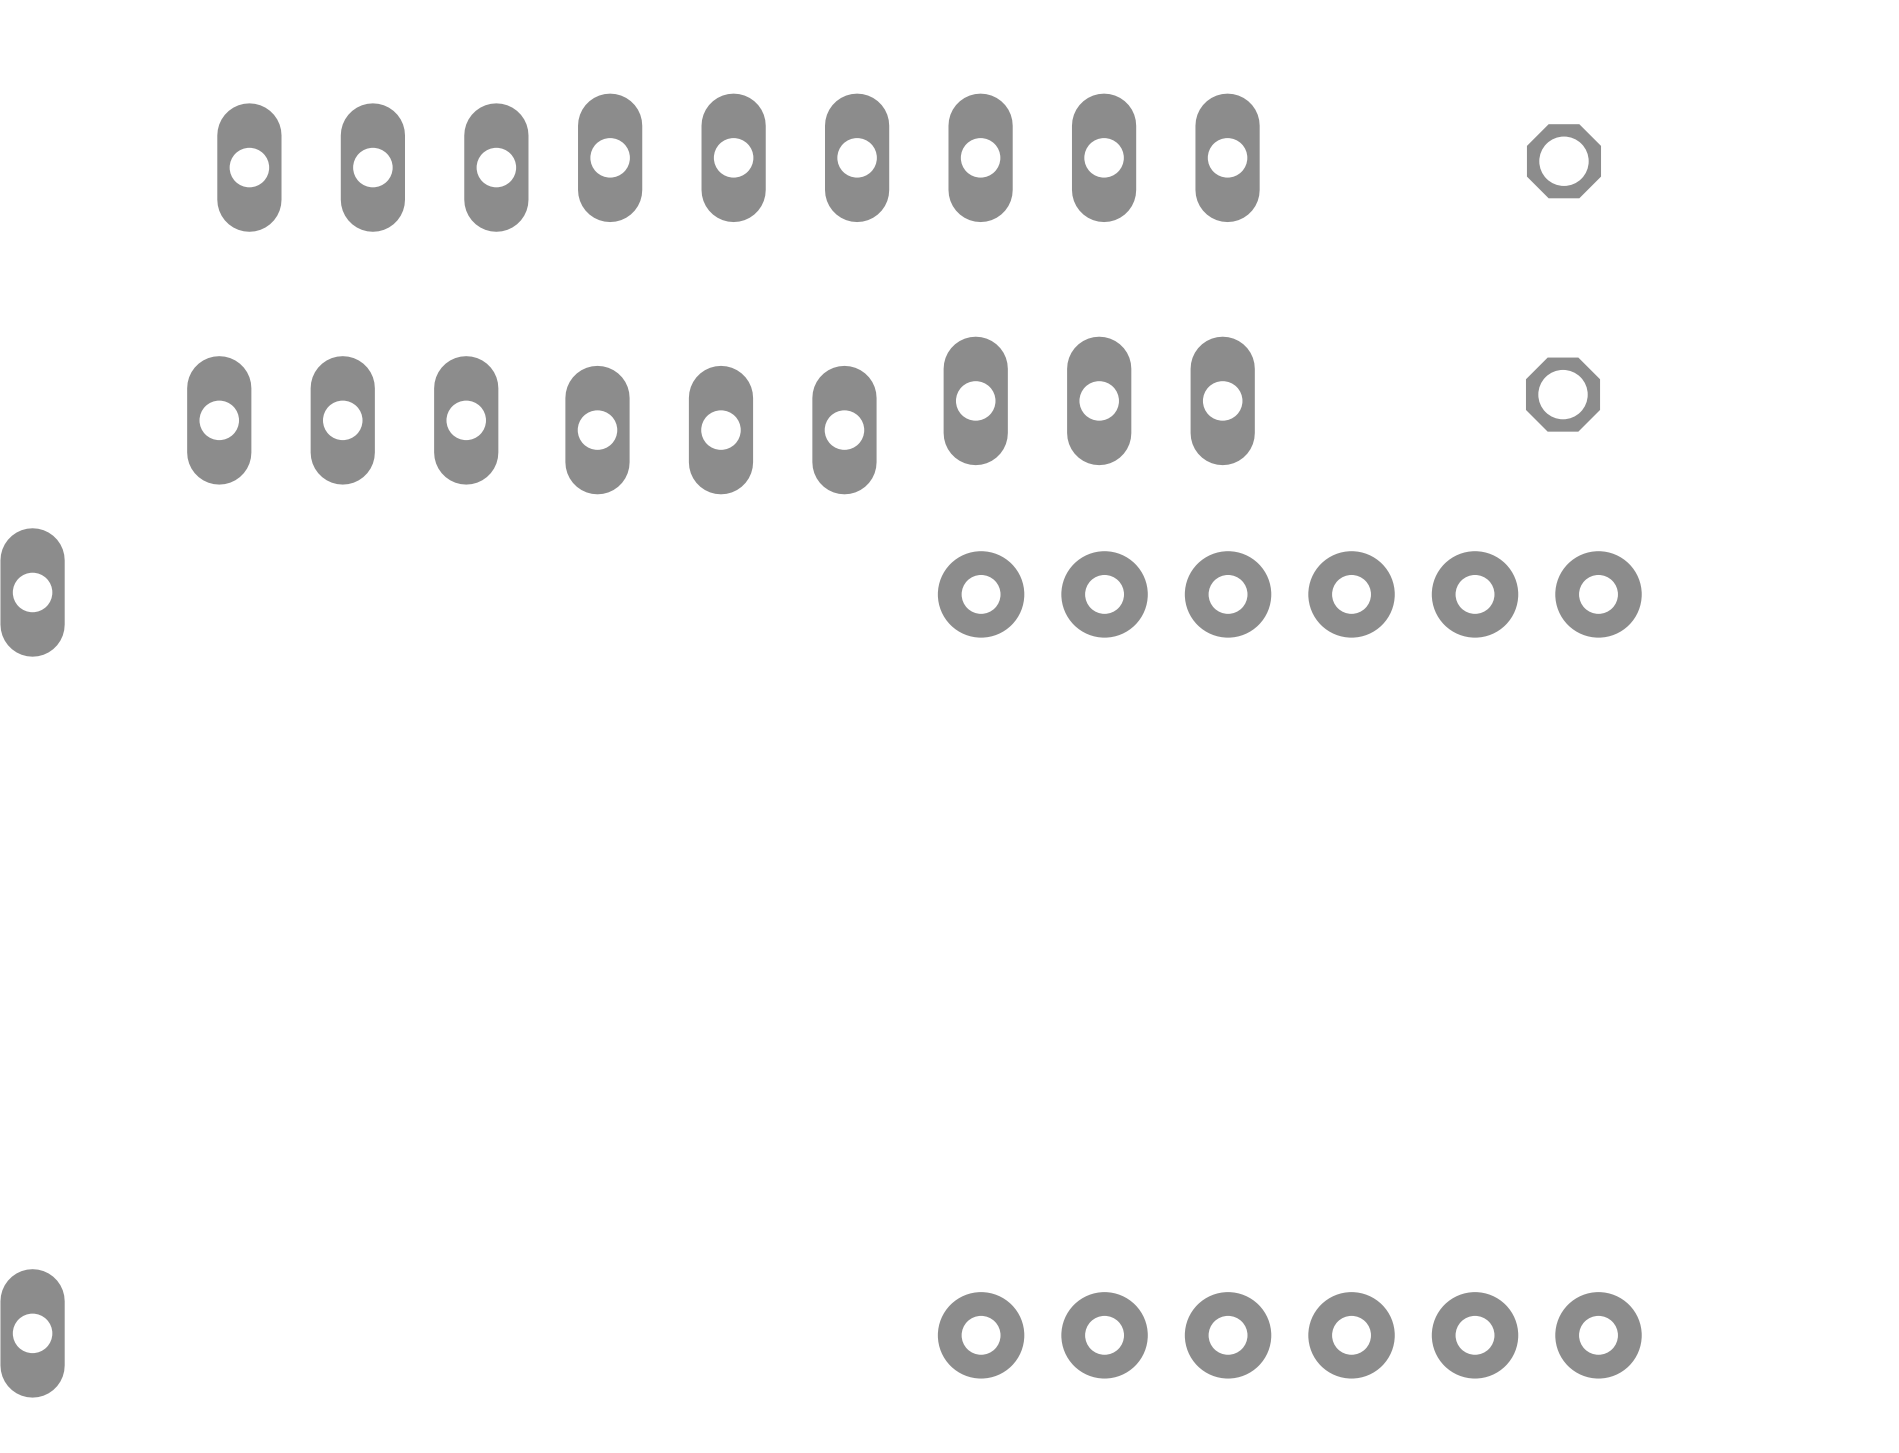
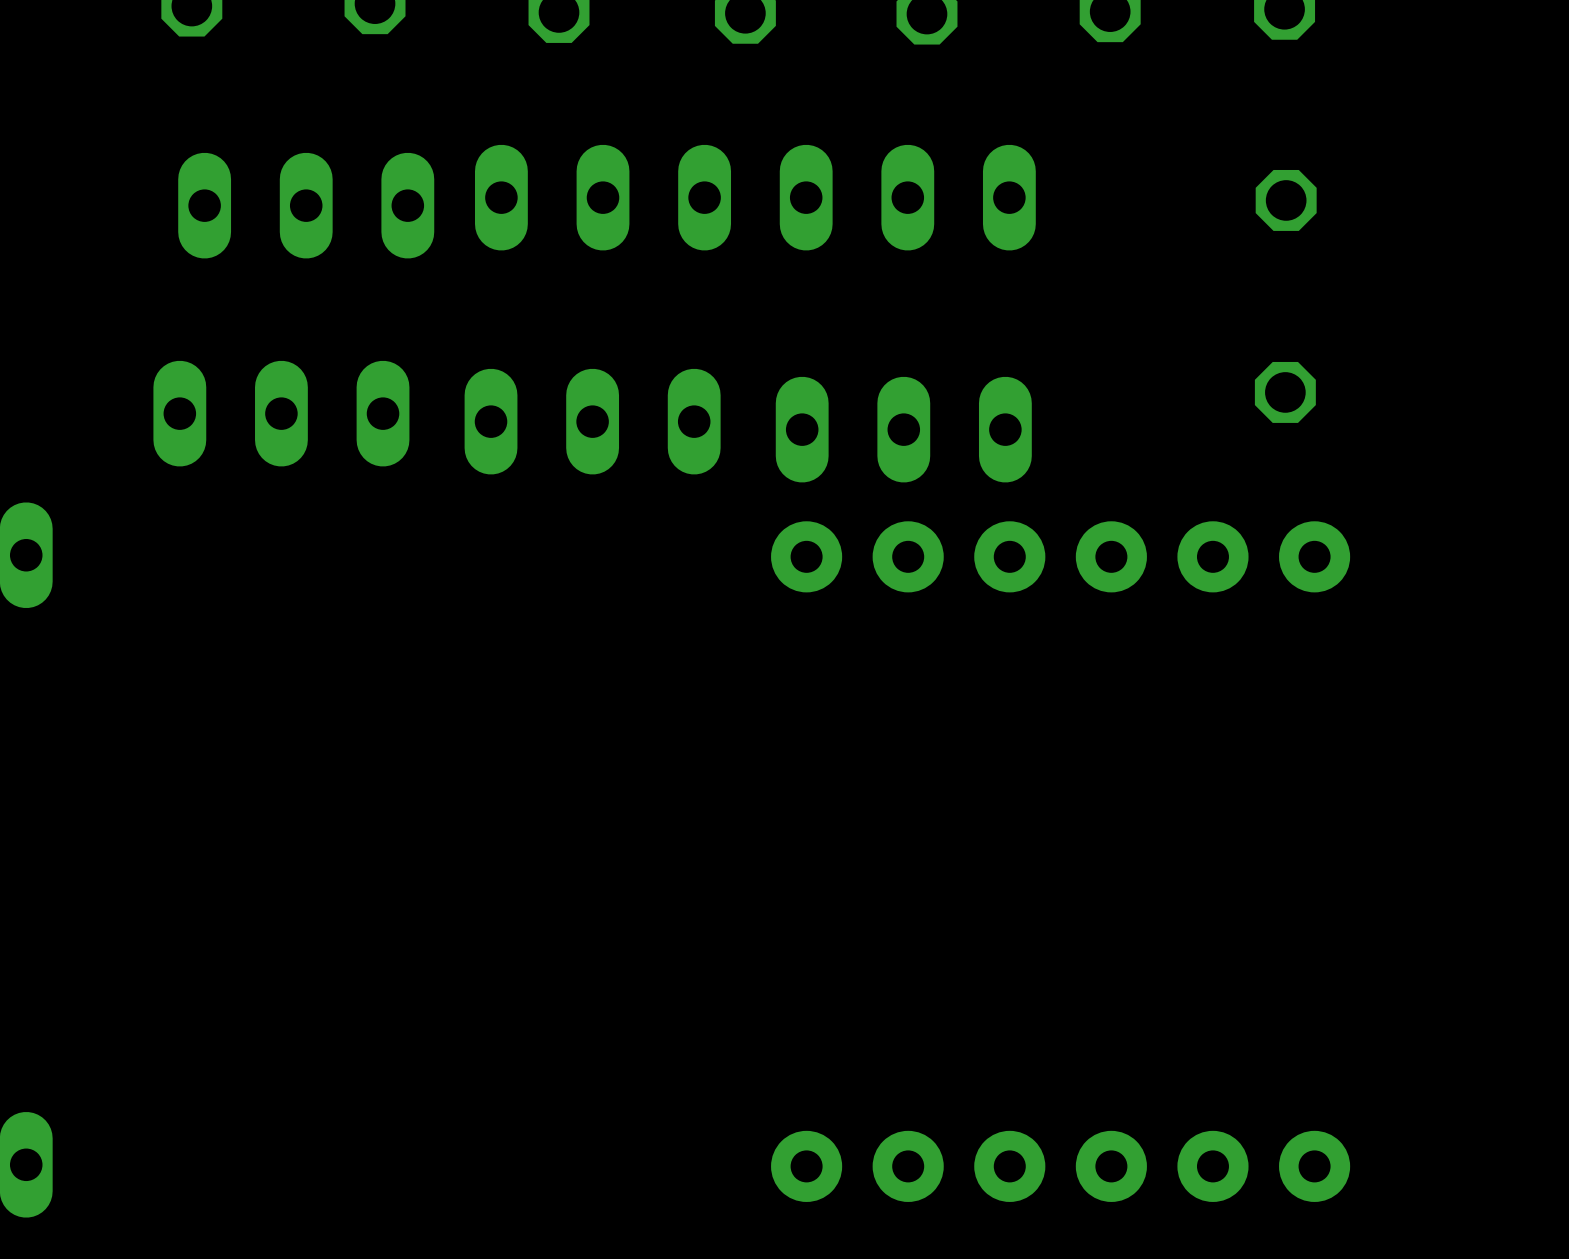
part position: (1099, 400) -> (903, 429)

